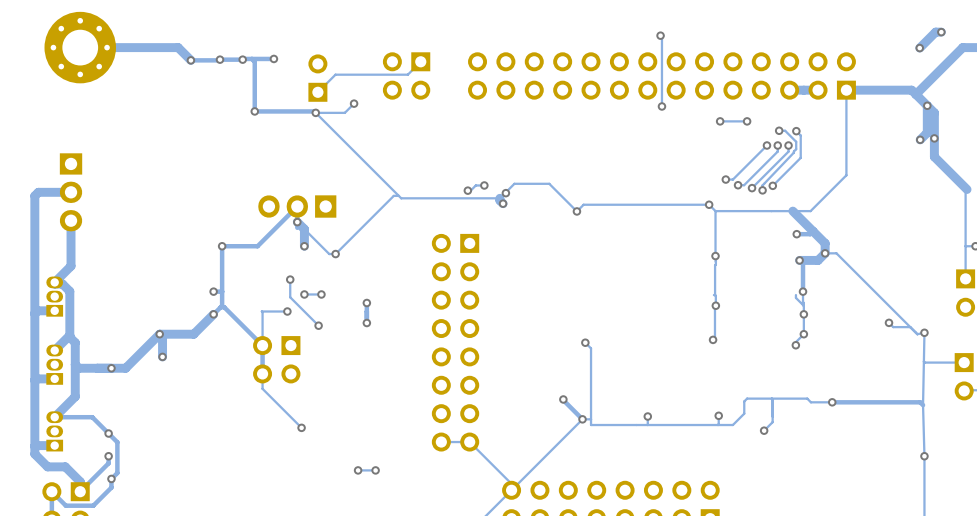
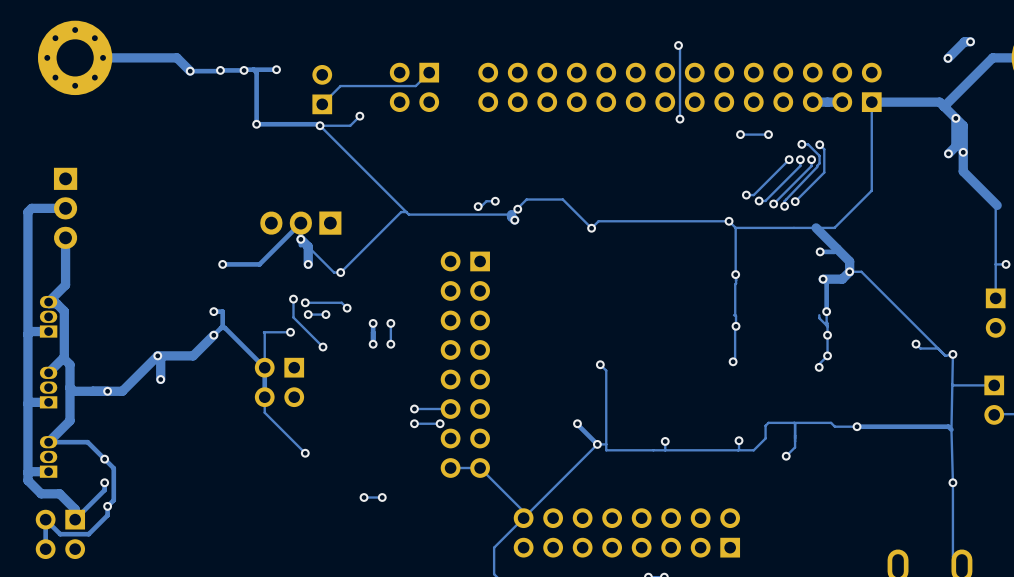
track: (222, 246) (222, 291) -> none
track: none -> (305, 302) (341, 302) (347, 308)
via: none -> (305, 302)
via: none -> (347, 308)
track: none -> (390, 323) (390, 344)
via: none -> (390, 323)
via: none -> (390, 344)
via: none -> (414, 408)
track: none -> (450, 408) (414, 408)
via: none -> (414, 423)
track: none -> (440, 423) (414, 423)
via: none -> (440, 423)

